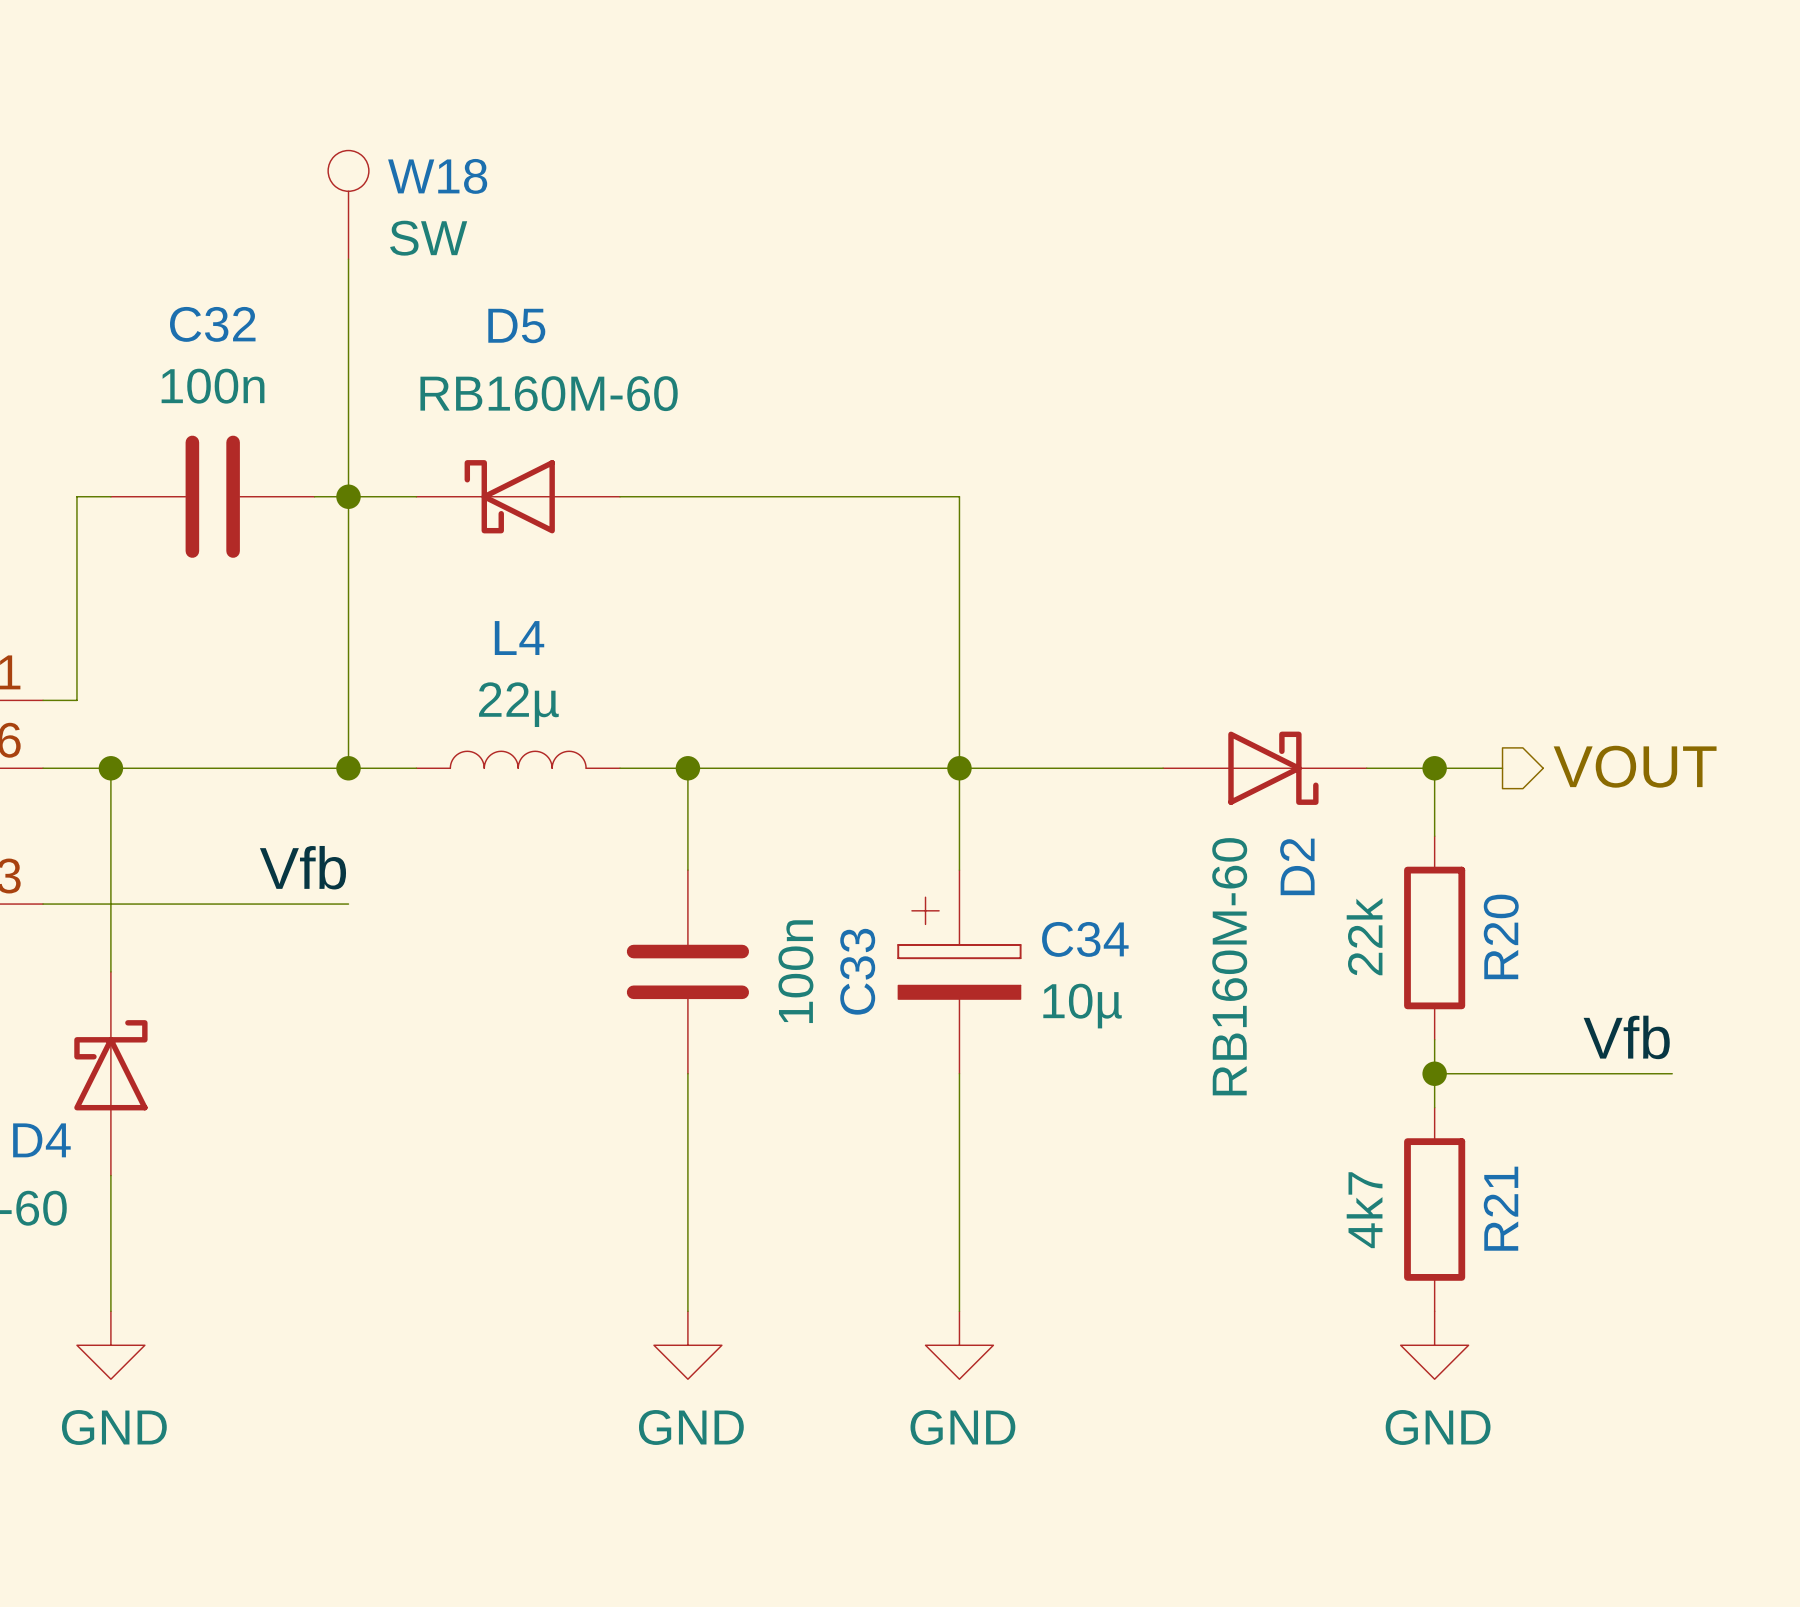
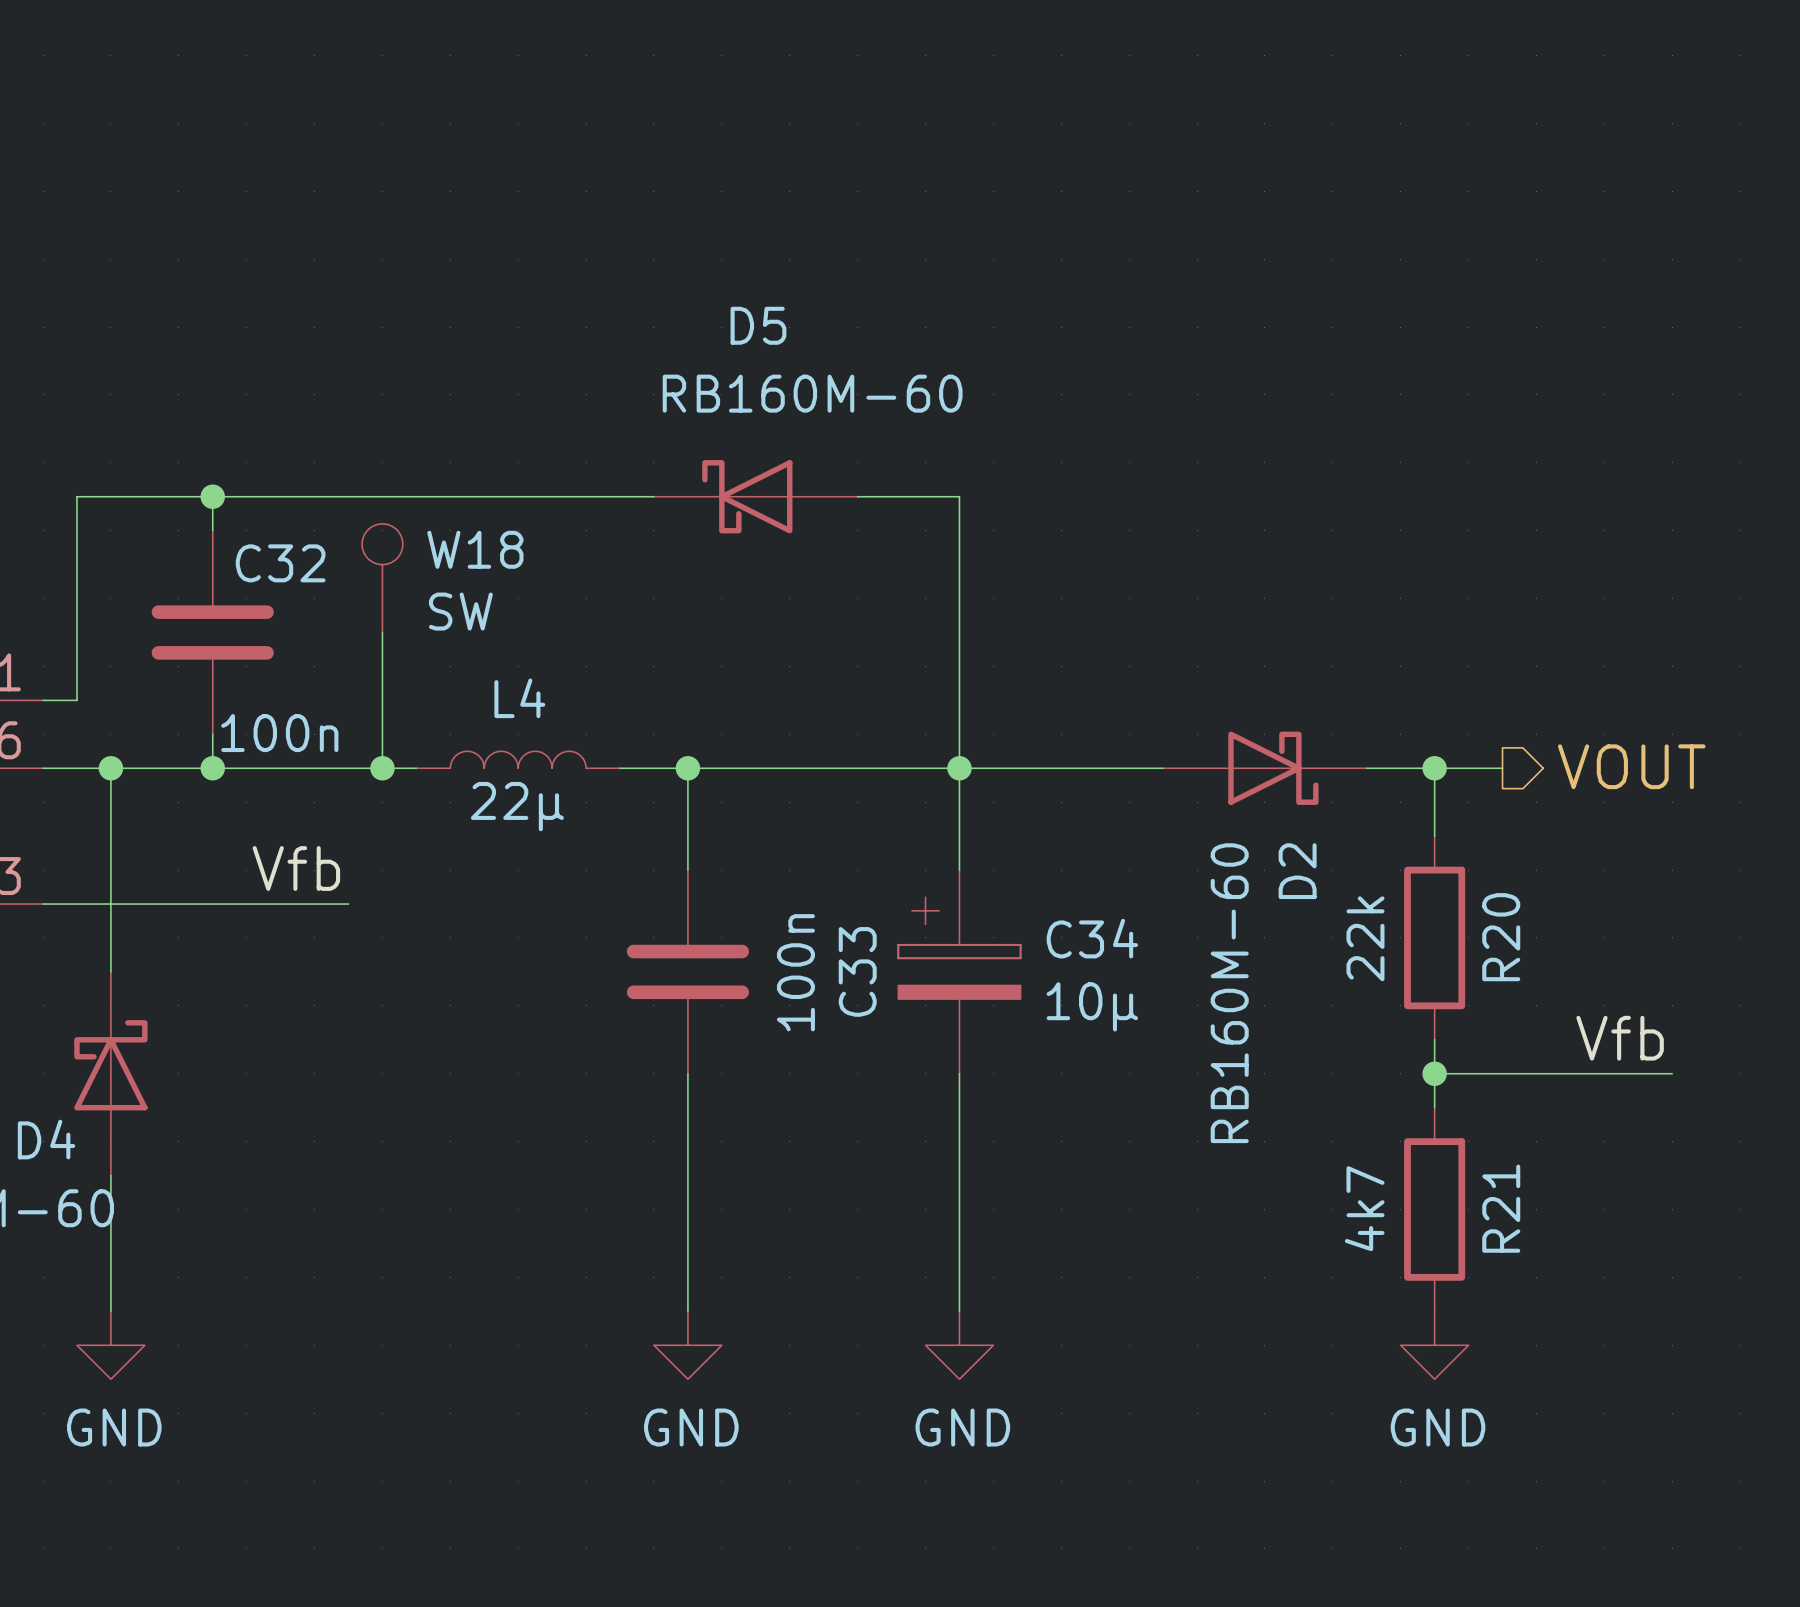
W18 position: (348, 204) -> (382, 578)
wire: (348, 259) (348, 768) -> none
C32 name position: C32 (212, 324) -> C32 (280, 563)
C32 value position: 100n (213, 386) -> 100n (279, 733)
wire: none -> (212, 496) (212, 530)
C32 rotation: 0° (212, 496) -> 90° clockwise (212, 632)
C32 position: (212, 496) -> (212, 632)
junction position: (348, 496) -> (212, 496)
D5 position: (518, 496) -> (755, 496)
wire: none -> (382, 632) (382, 768)
L4 name position: L4 (519, 638) -> L4 (519, 698)
L4 value position: 22µ (518, 704) -> 22µ (517, 806)
wire: none -> (212, 734) (212, 768)
junction: none -> (212, 768)
junction position: (348, 768) -> (382, 768)

